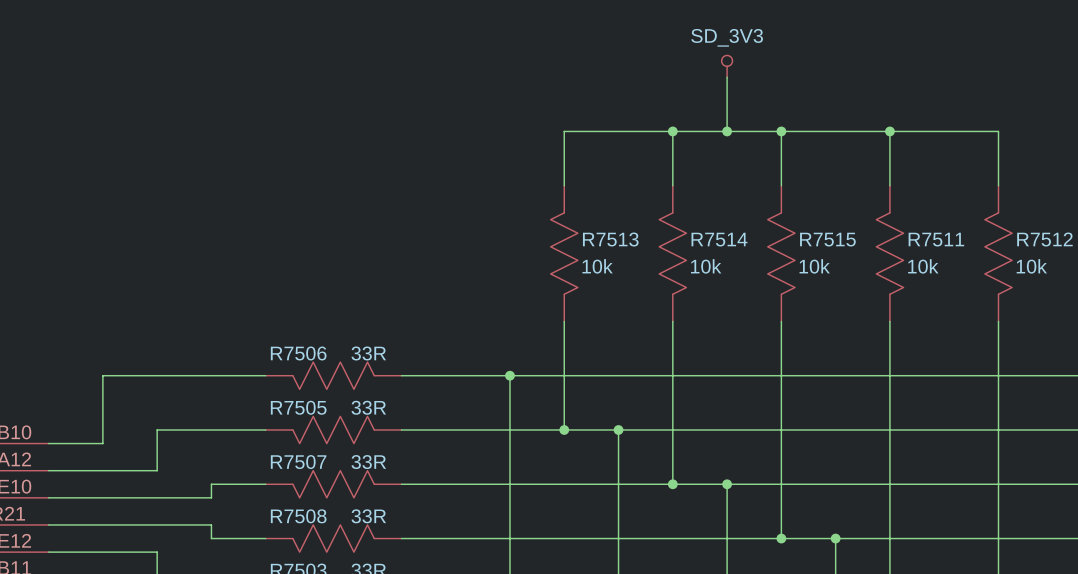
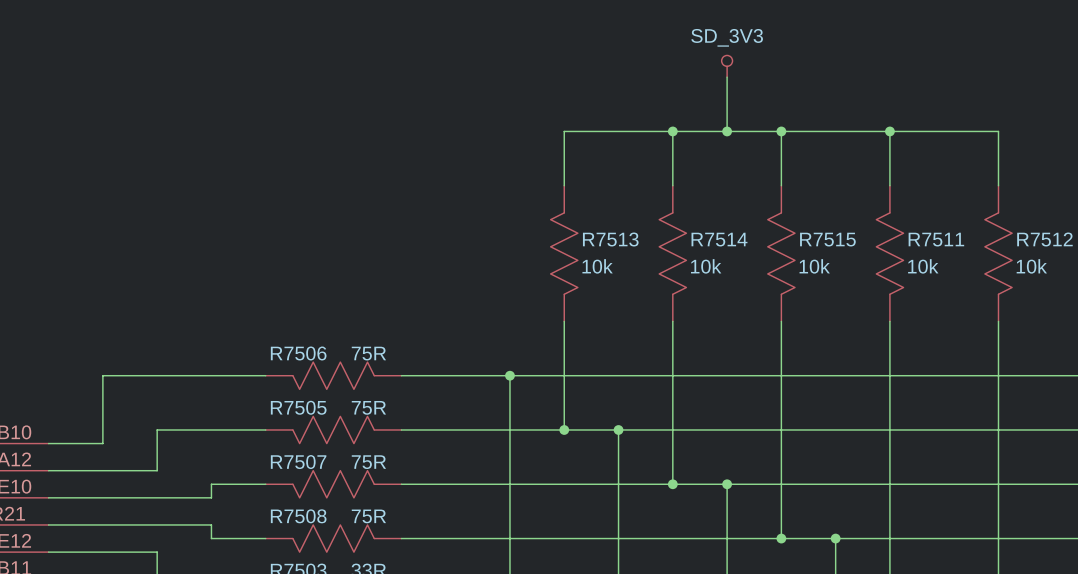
R7506 value: 33R (368, 353) -> 75R (368, 353)
R7505 value: 33R (368, 407) -> 75R (368, 407)
R7507 value: 33R (368, 462) -> 75R (368, 462)
R7508 value: 33R (368, 516) -> 75R (368, 516)

